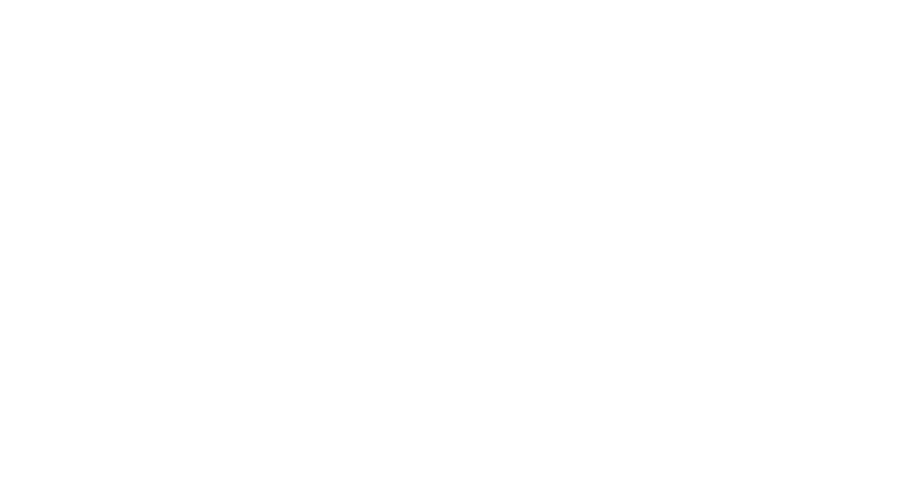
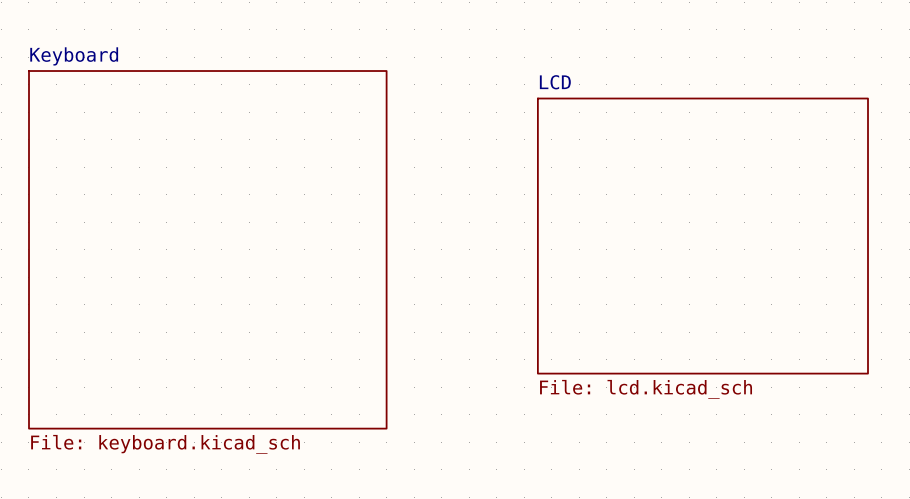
sheet LCD: none -> File: lcd.kicad_sch (702, 236)
sheet Keyboard: none -> File: keyboard.kicad_sch (207, 249)

